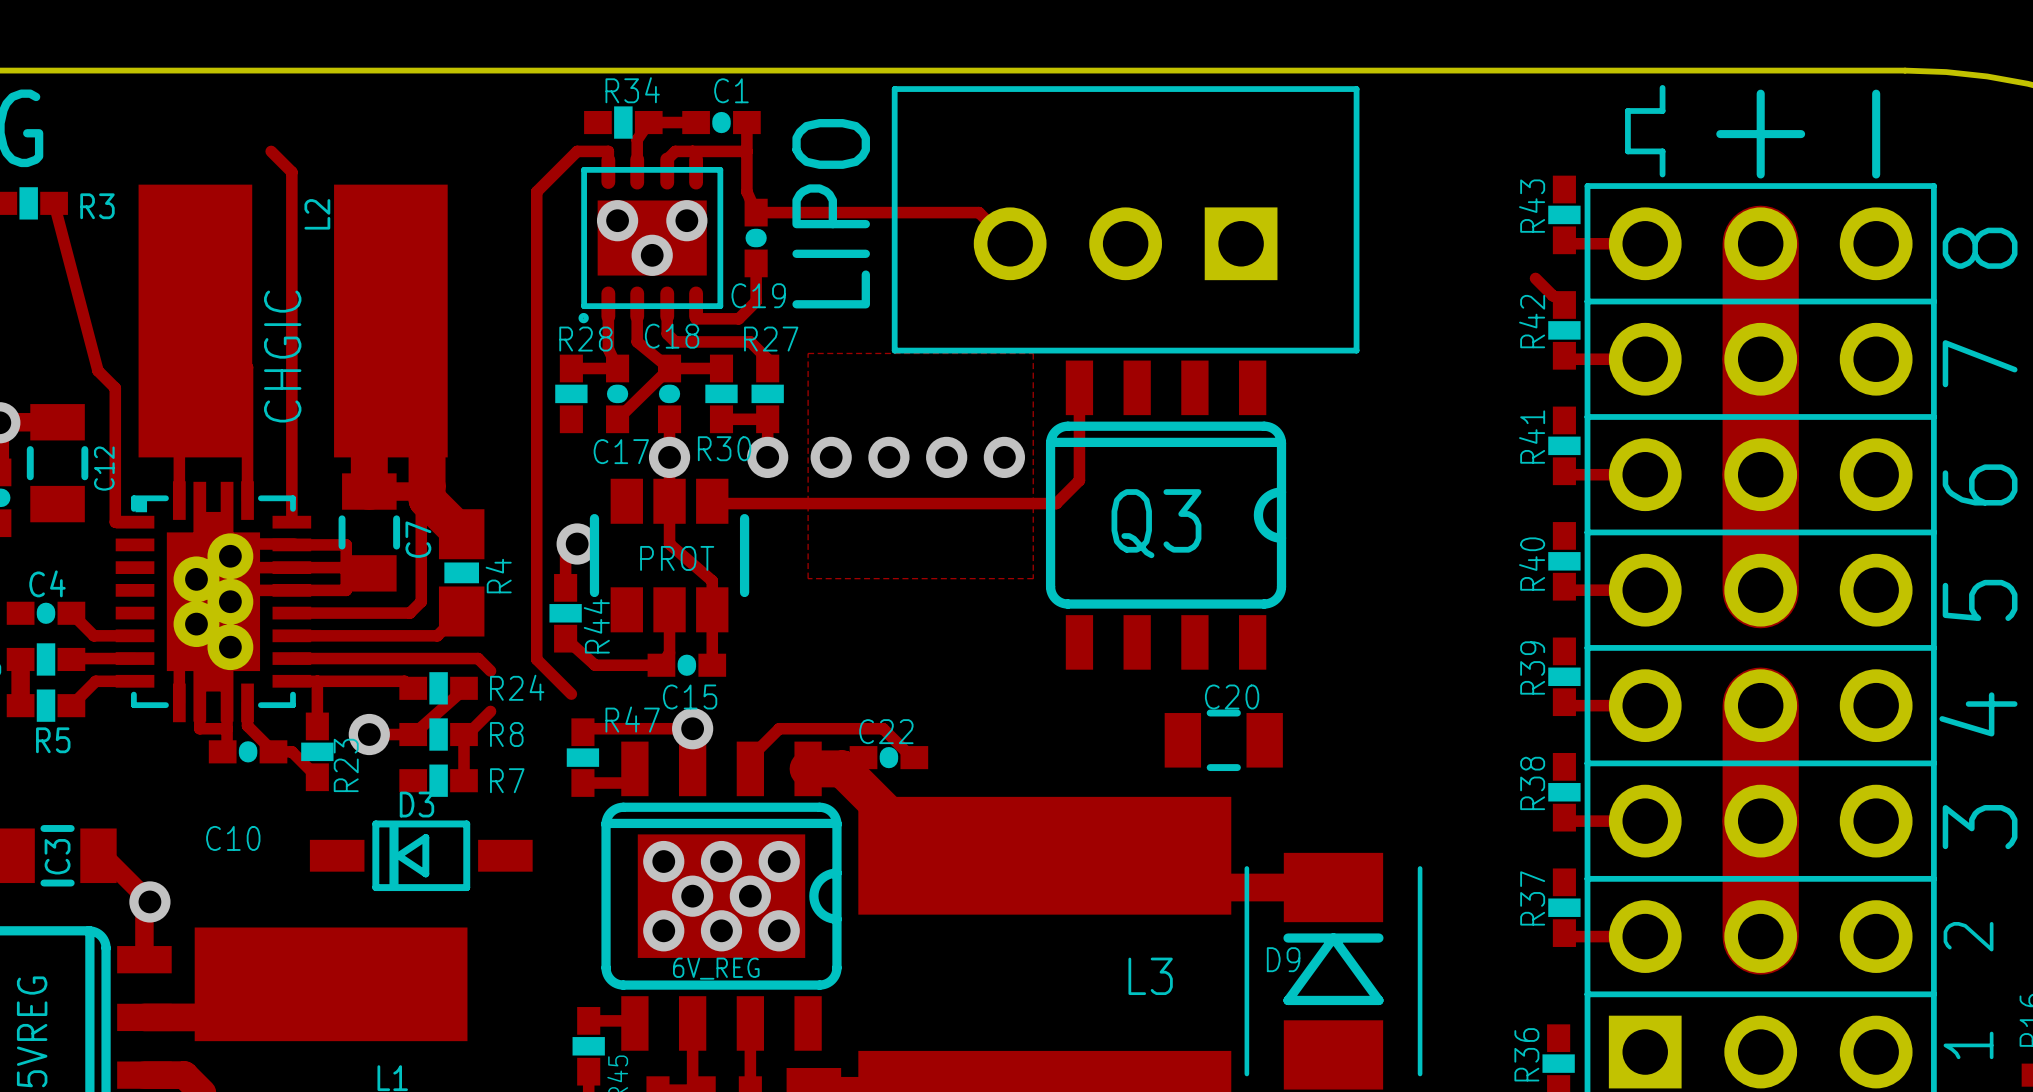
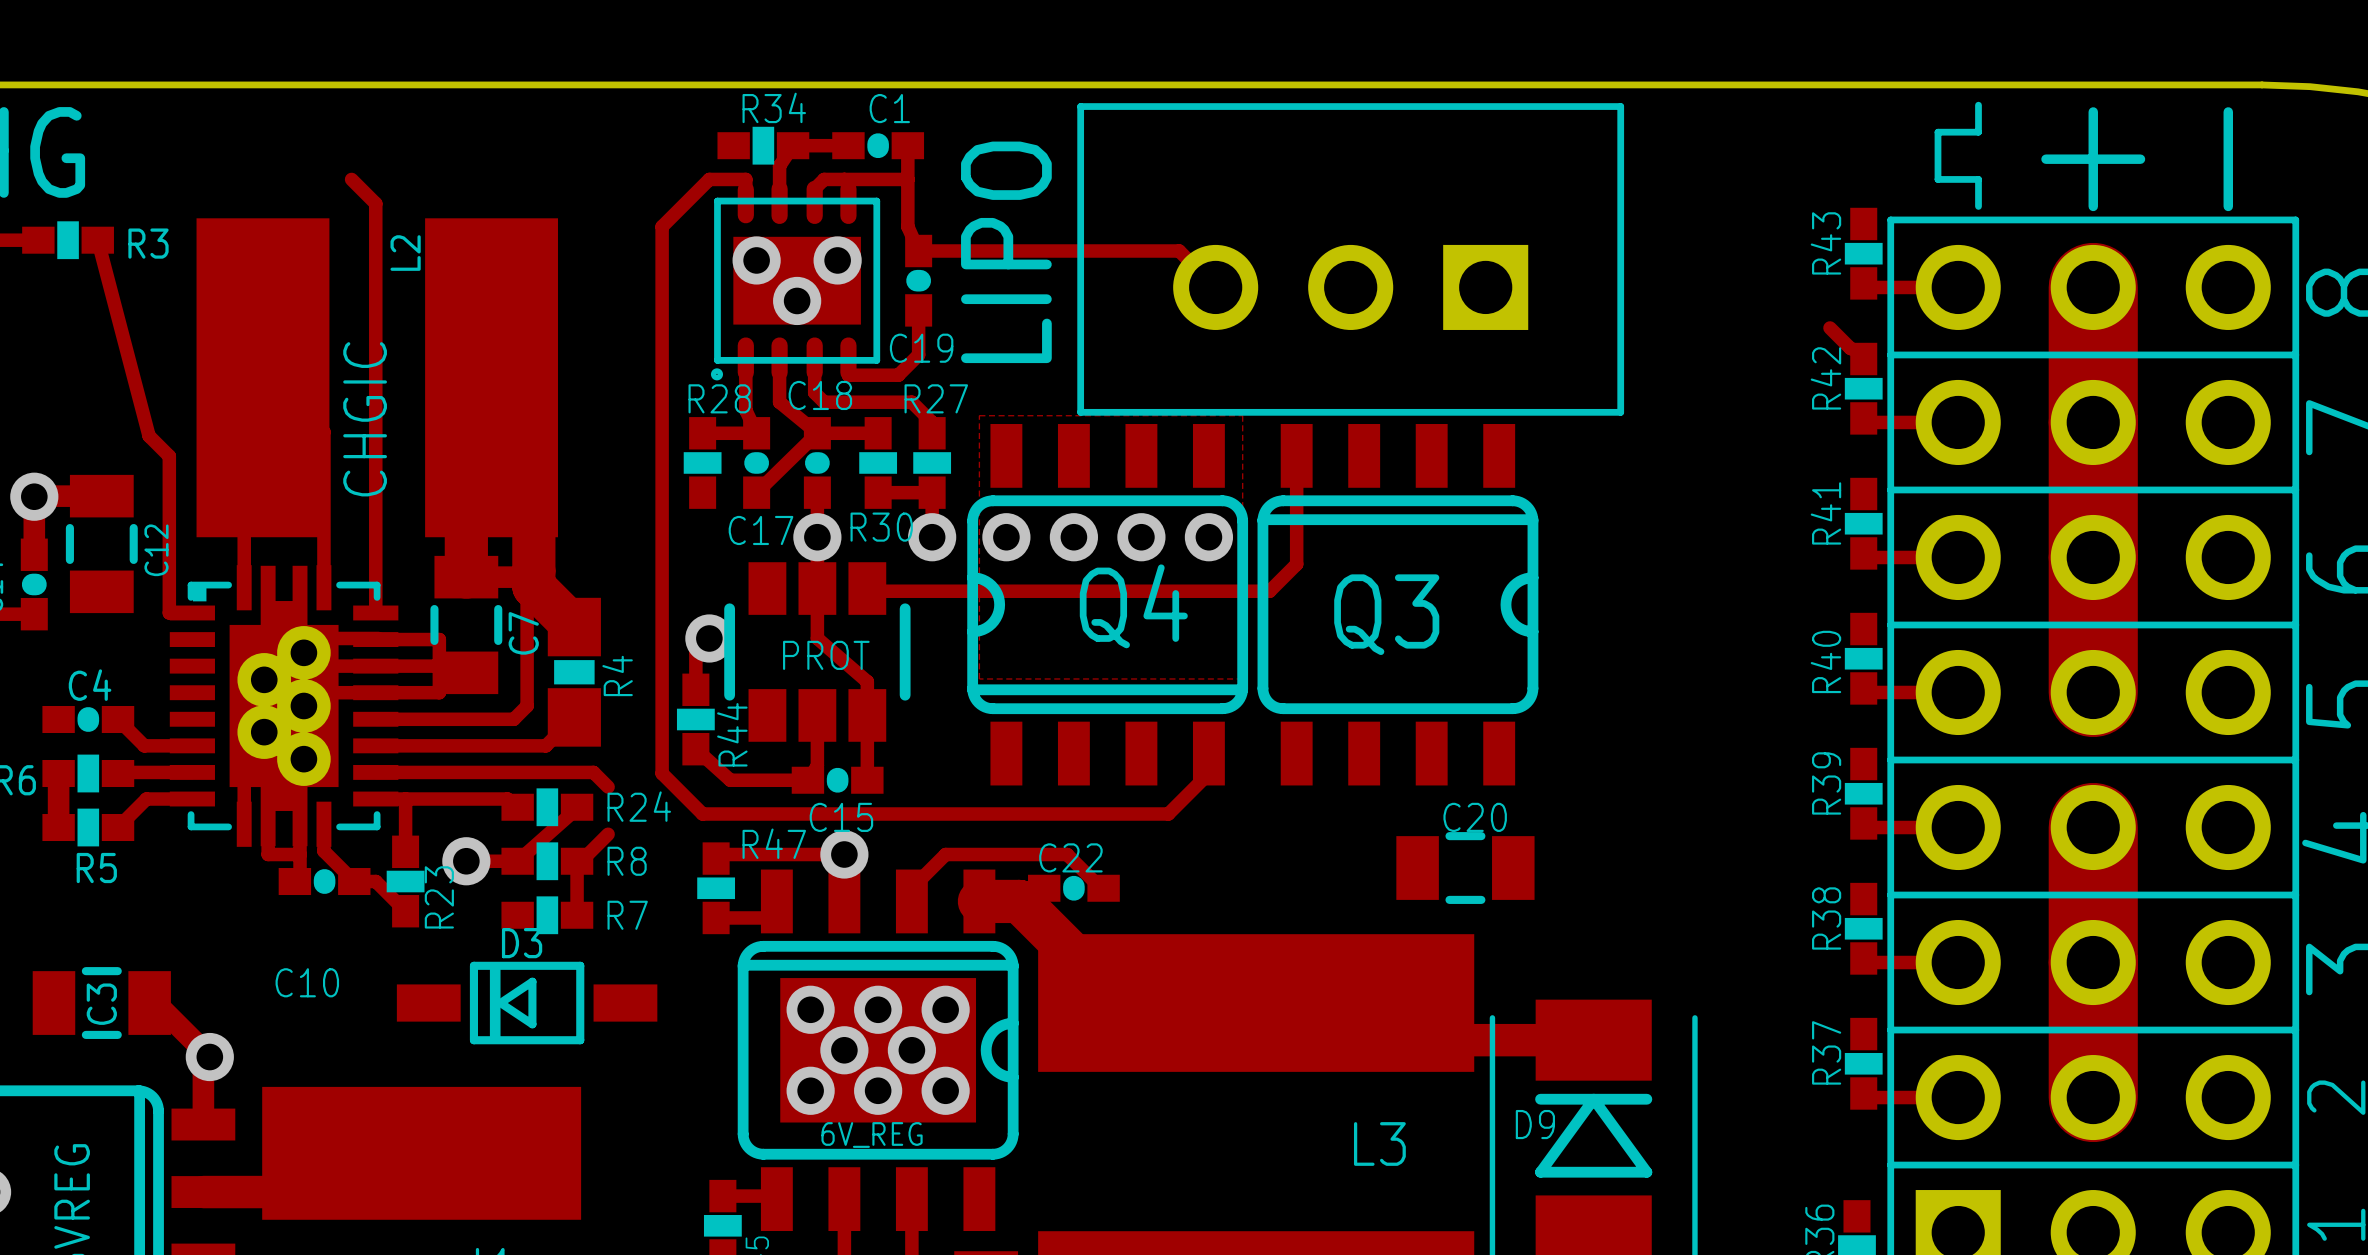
Q4: none -> (1107, 604)
track: none -> (1208, 753) (1208, 773) (1168, 814) (702, 814)

